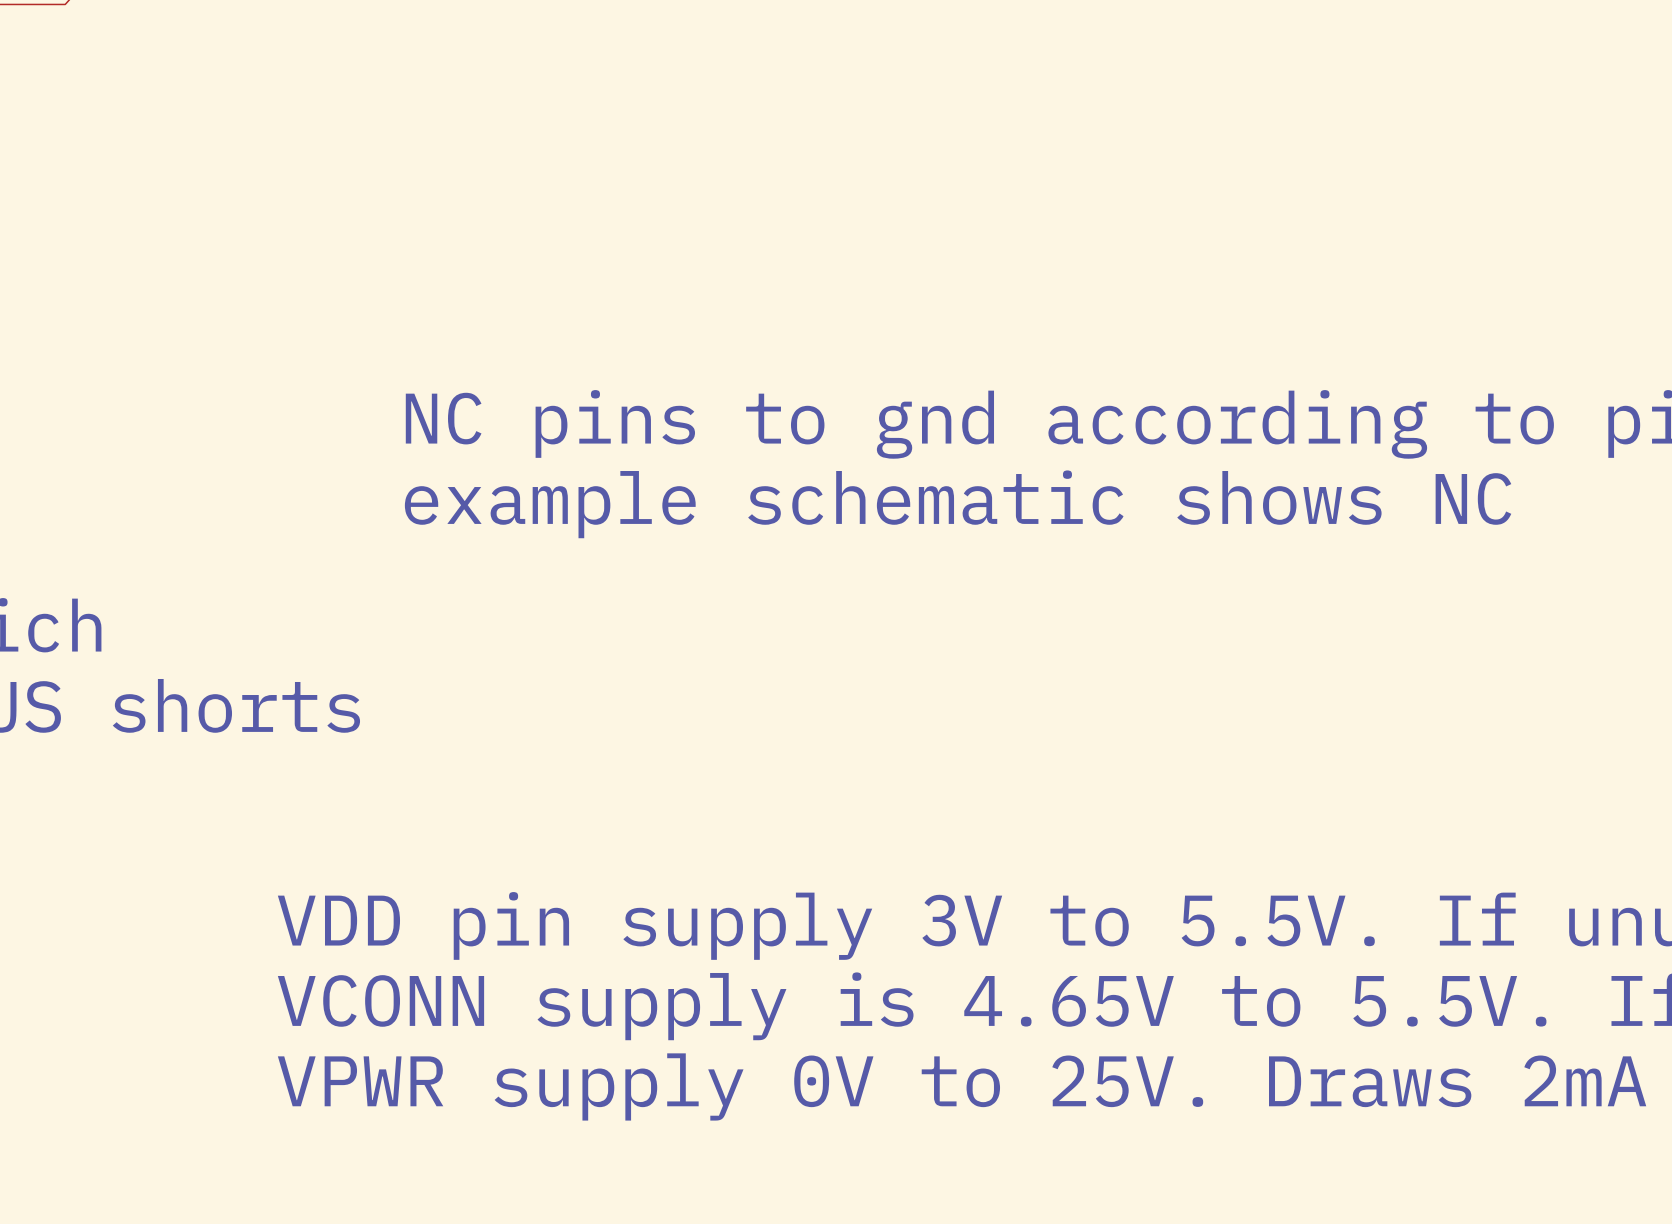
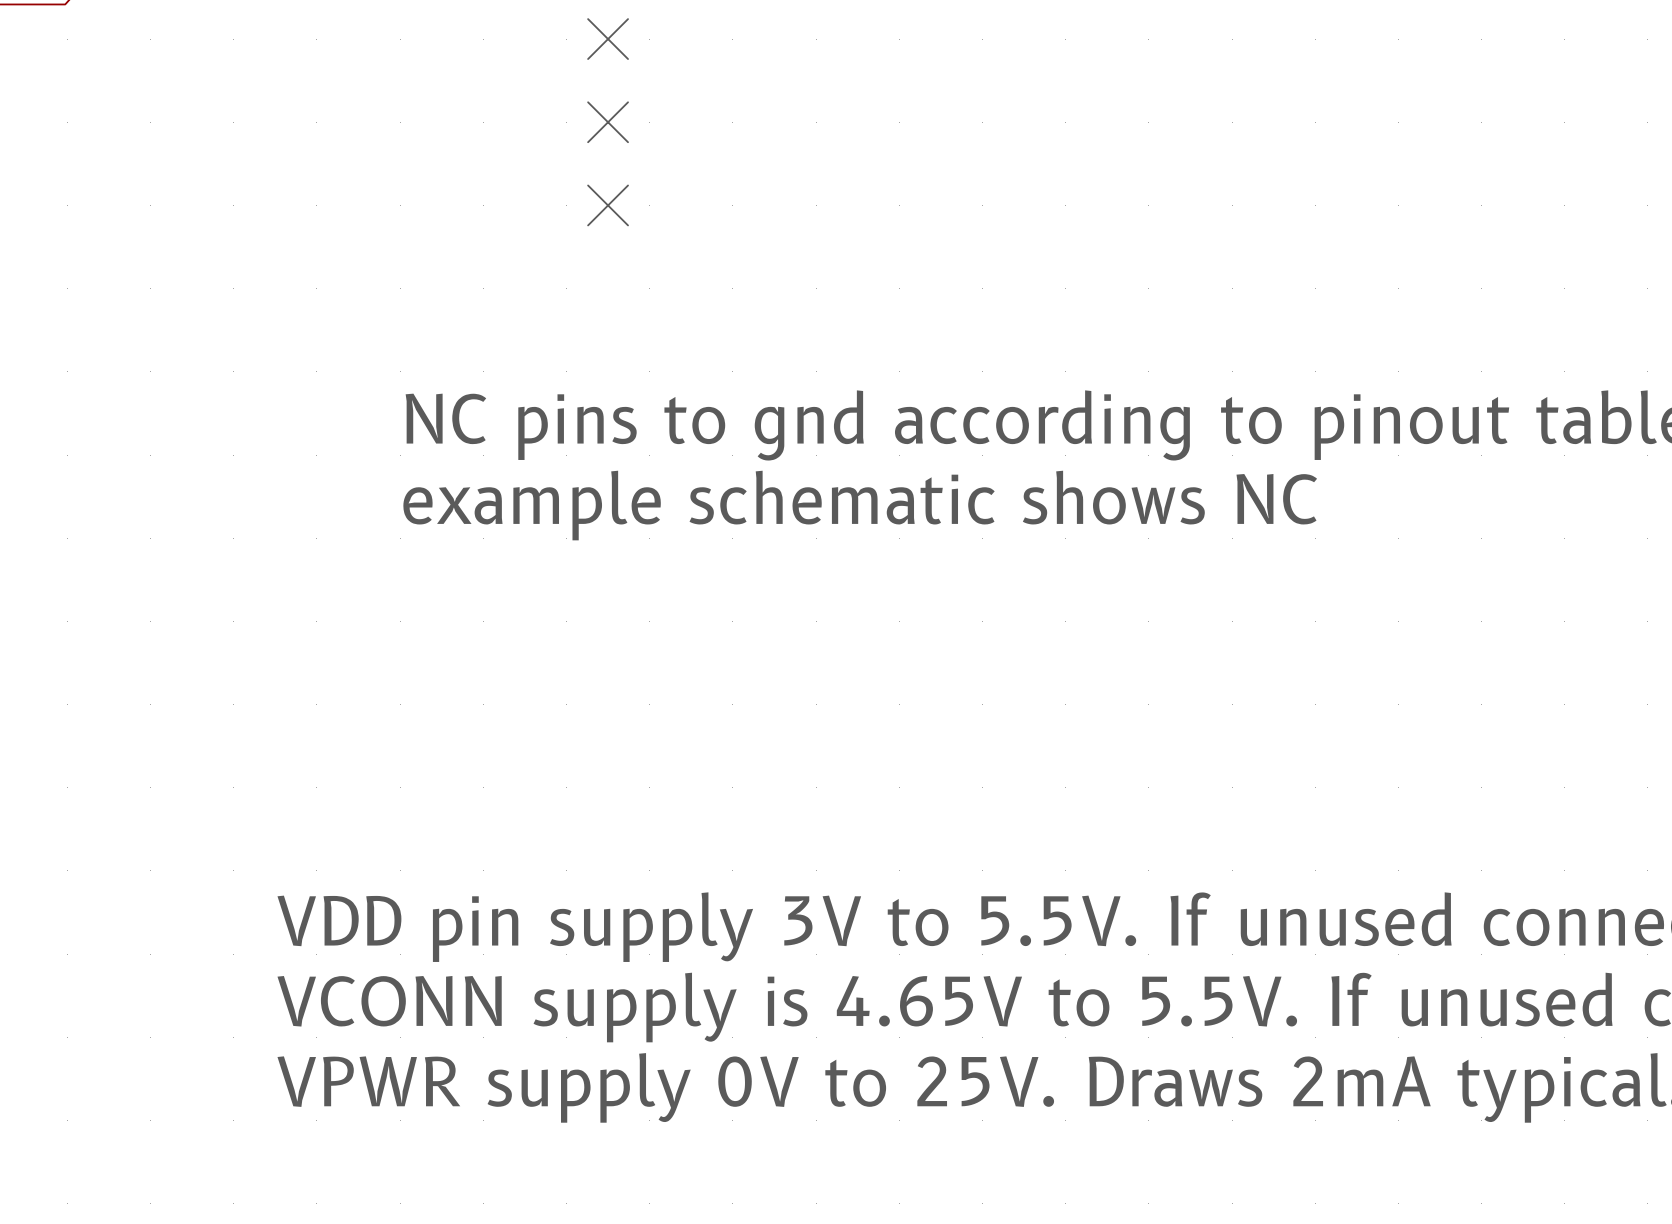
no-connect mark: none -> (608, 39)
no-connect mark: none -> (608, 122)
no-connect mark: none -> (608, 205)

